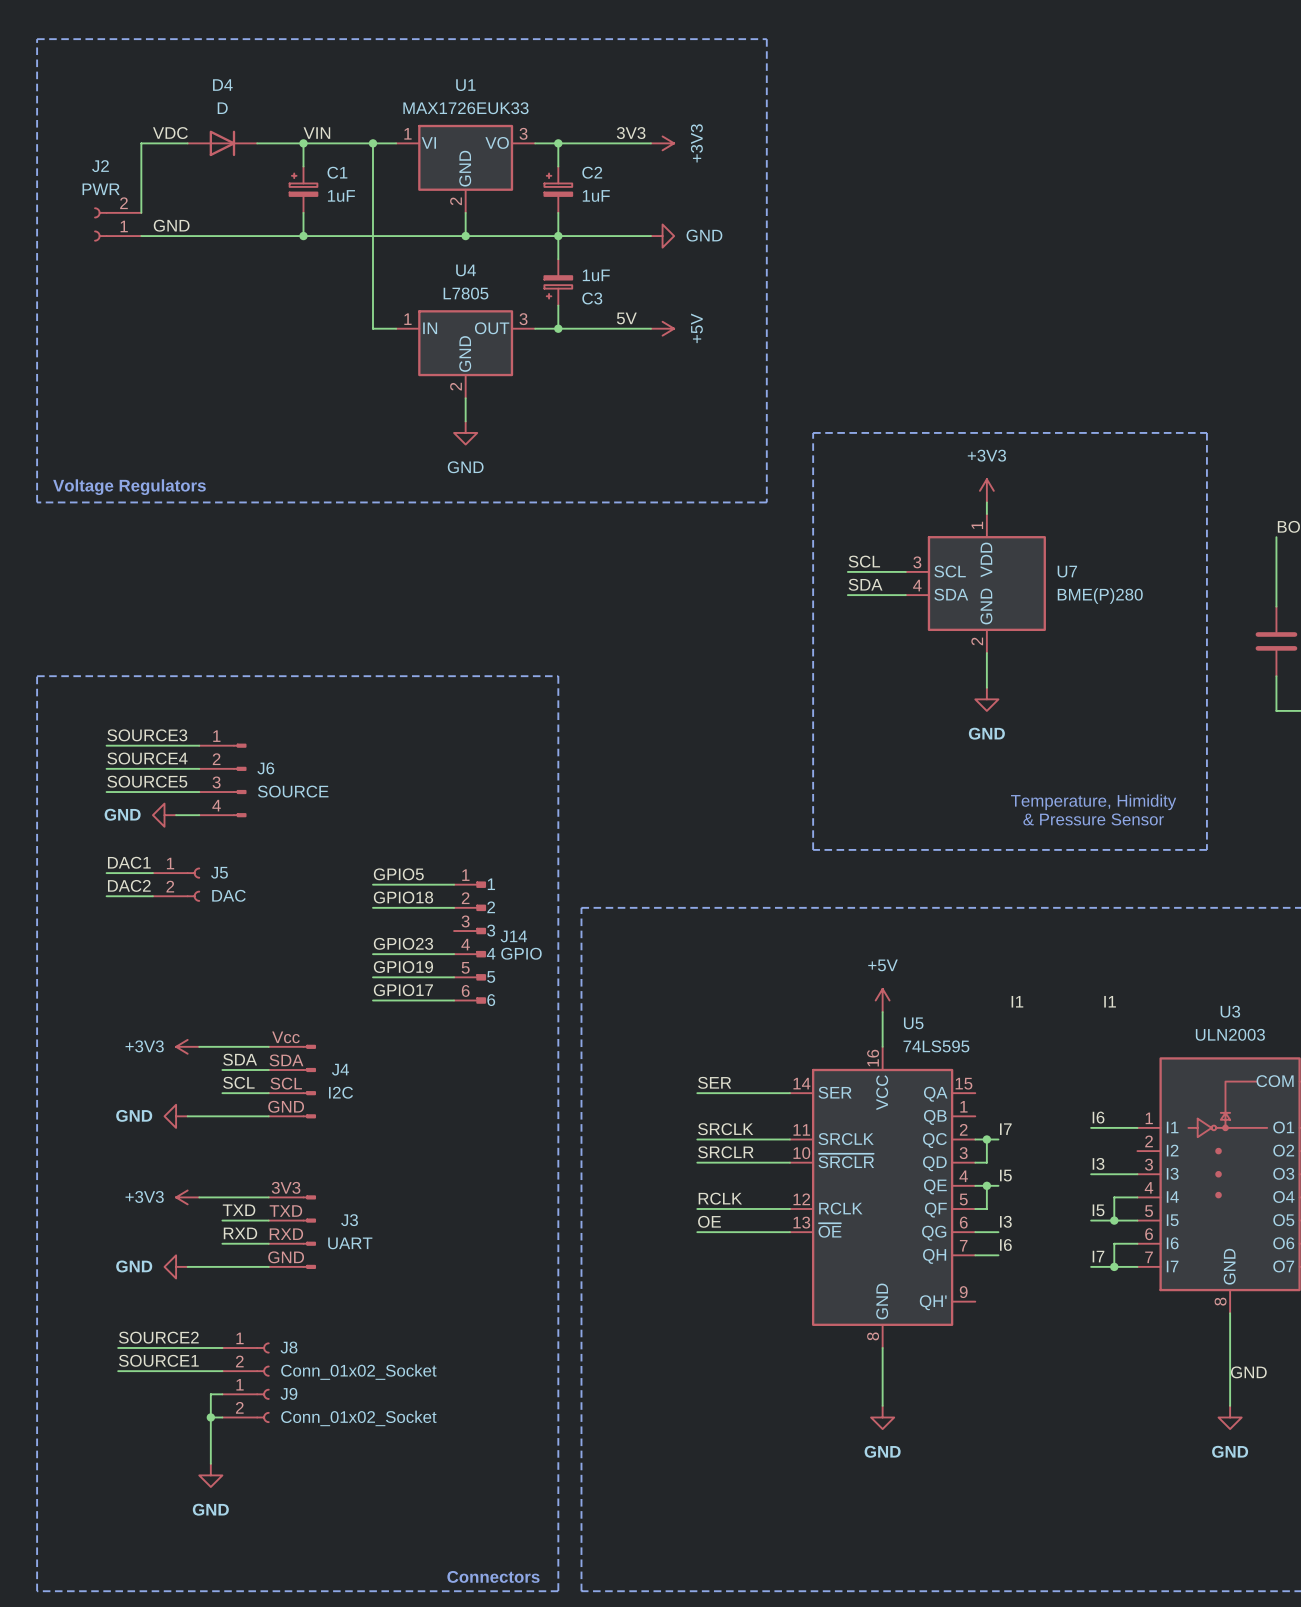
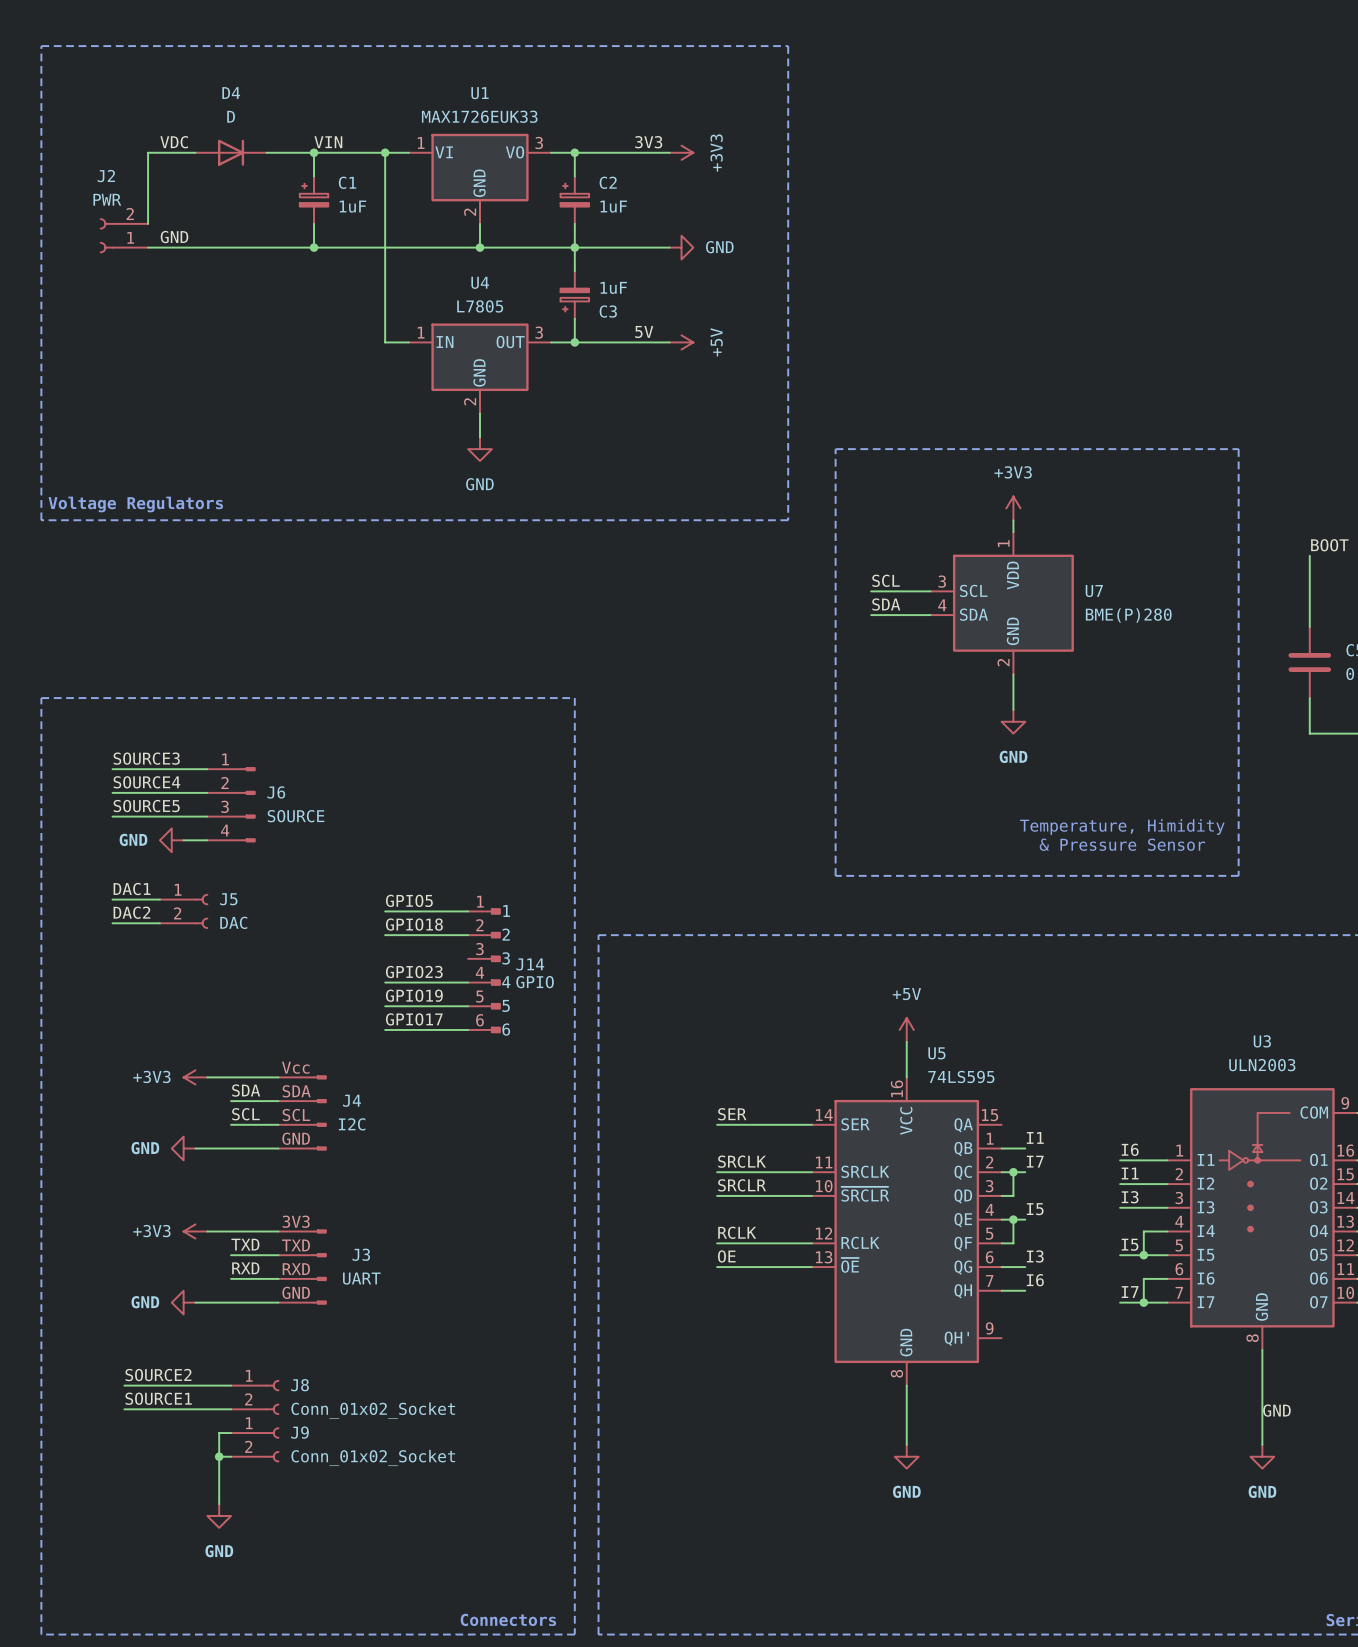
label: I1 (1017, 1001) -> none
label: I1 (1110, 1001) -> none
label: none -> I1 (1035, 1137)
wire: none -> (1001, 1148) (1025, 1148)
label: none -> I1 (1130, 1173)
wire: none -> (1120, 1184) (1167, 1184)

